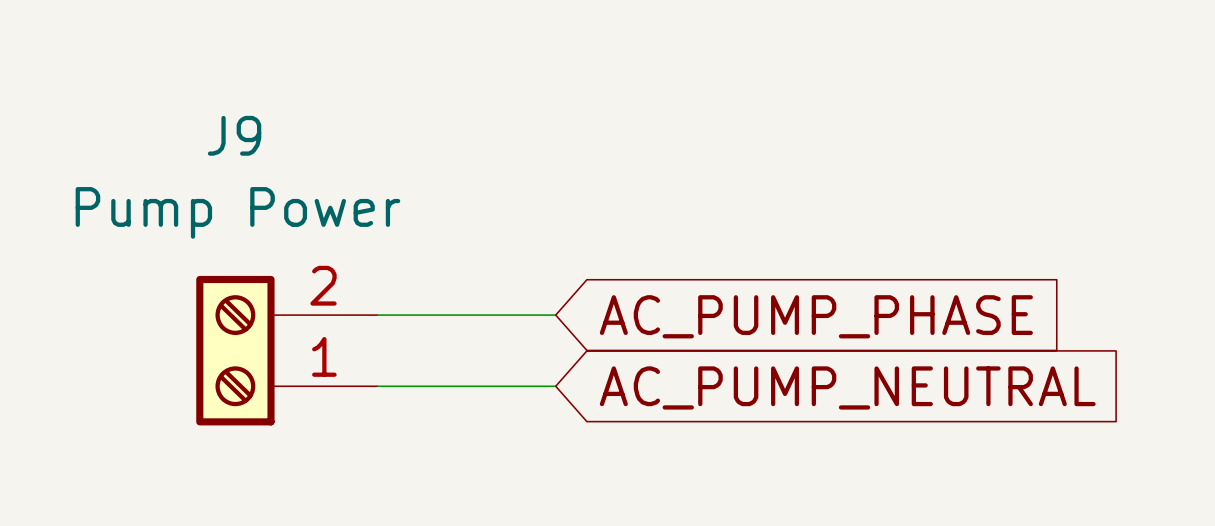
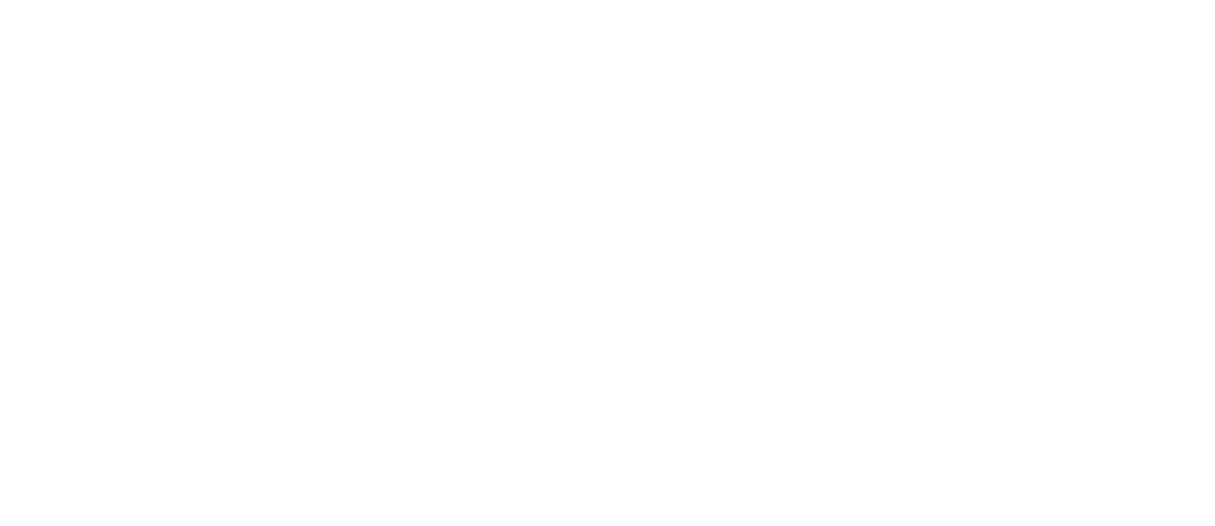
wire: (377, 315) (555, 315) -> none
global label: AC_PUMP_PHASE (816, 316) -> none
J9: Pump Power (287, 350) -> none
wire: (377, 386) (555, 386) -> none
global label: AC_PUMP_NEUTRAL (847, 387) -> none

